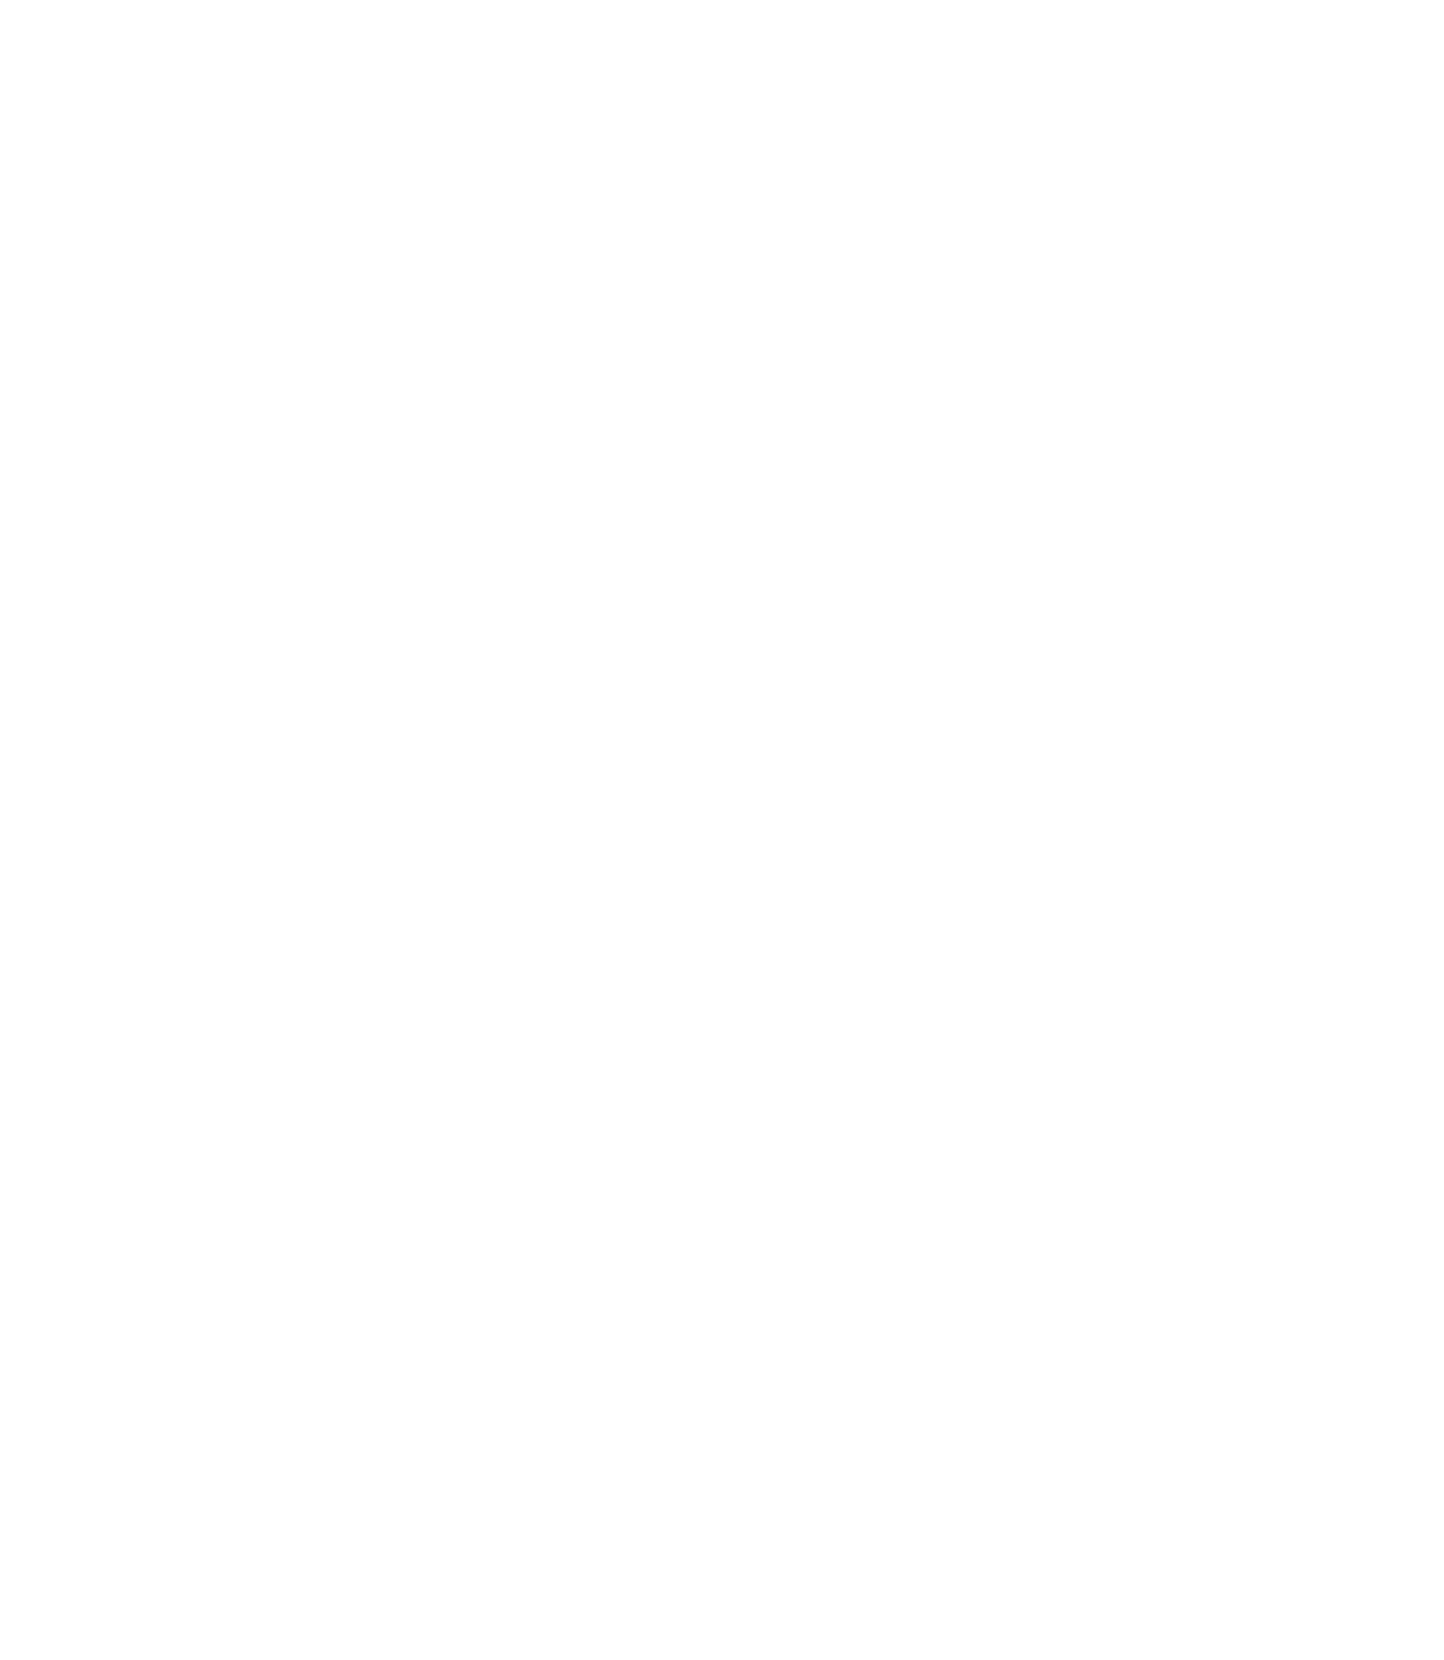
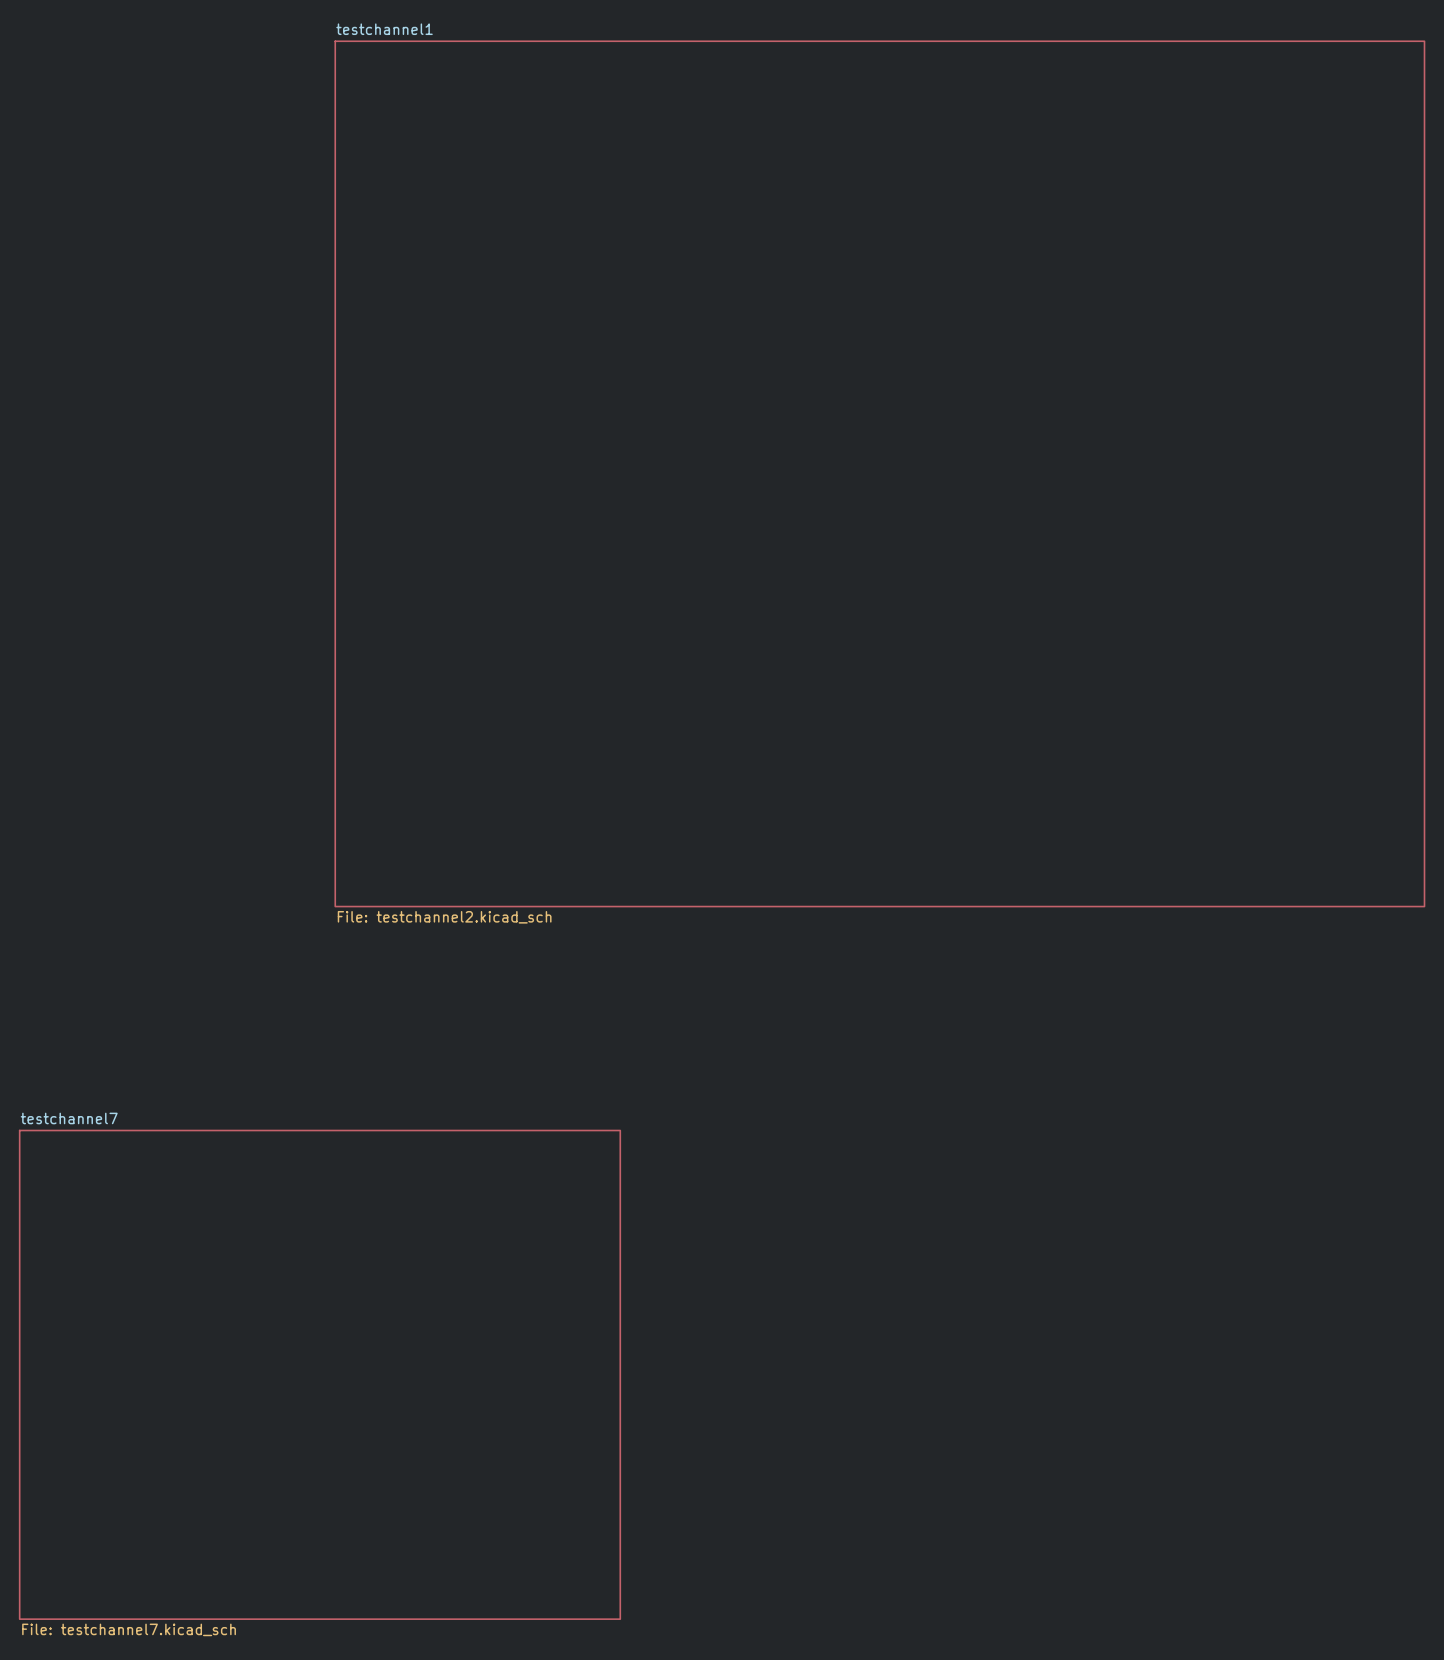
sheet testchannel1: none -> File: testchannel2.kicad_sch (879, 473)
sheet testchannel7: none -> File: testchannel7.kicad_sch (319, 1374)

